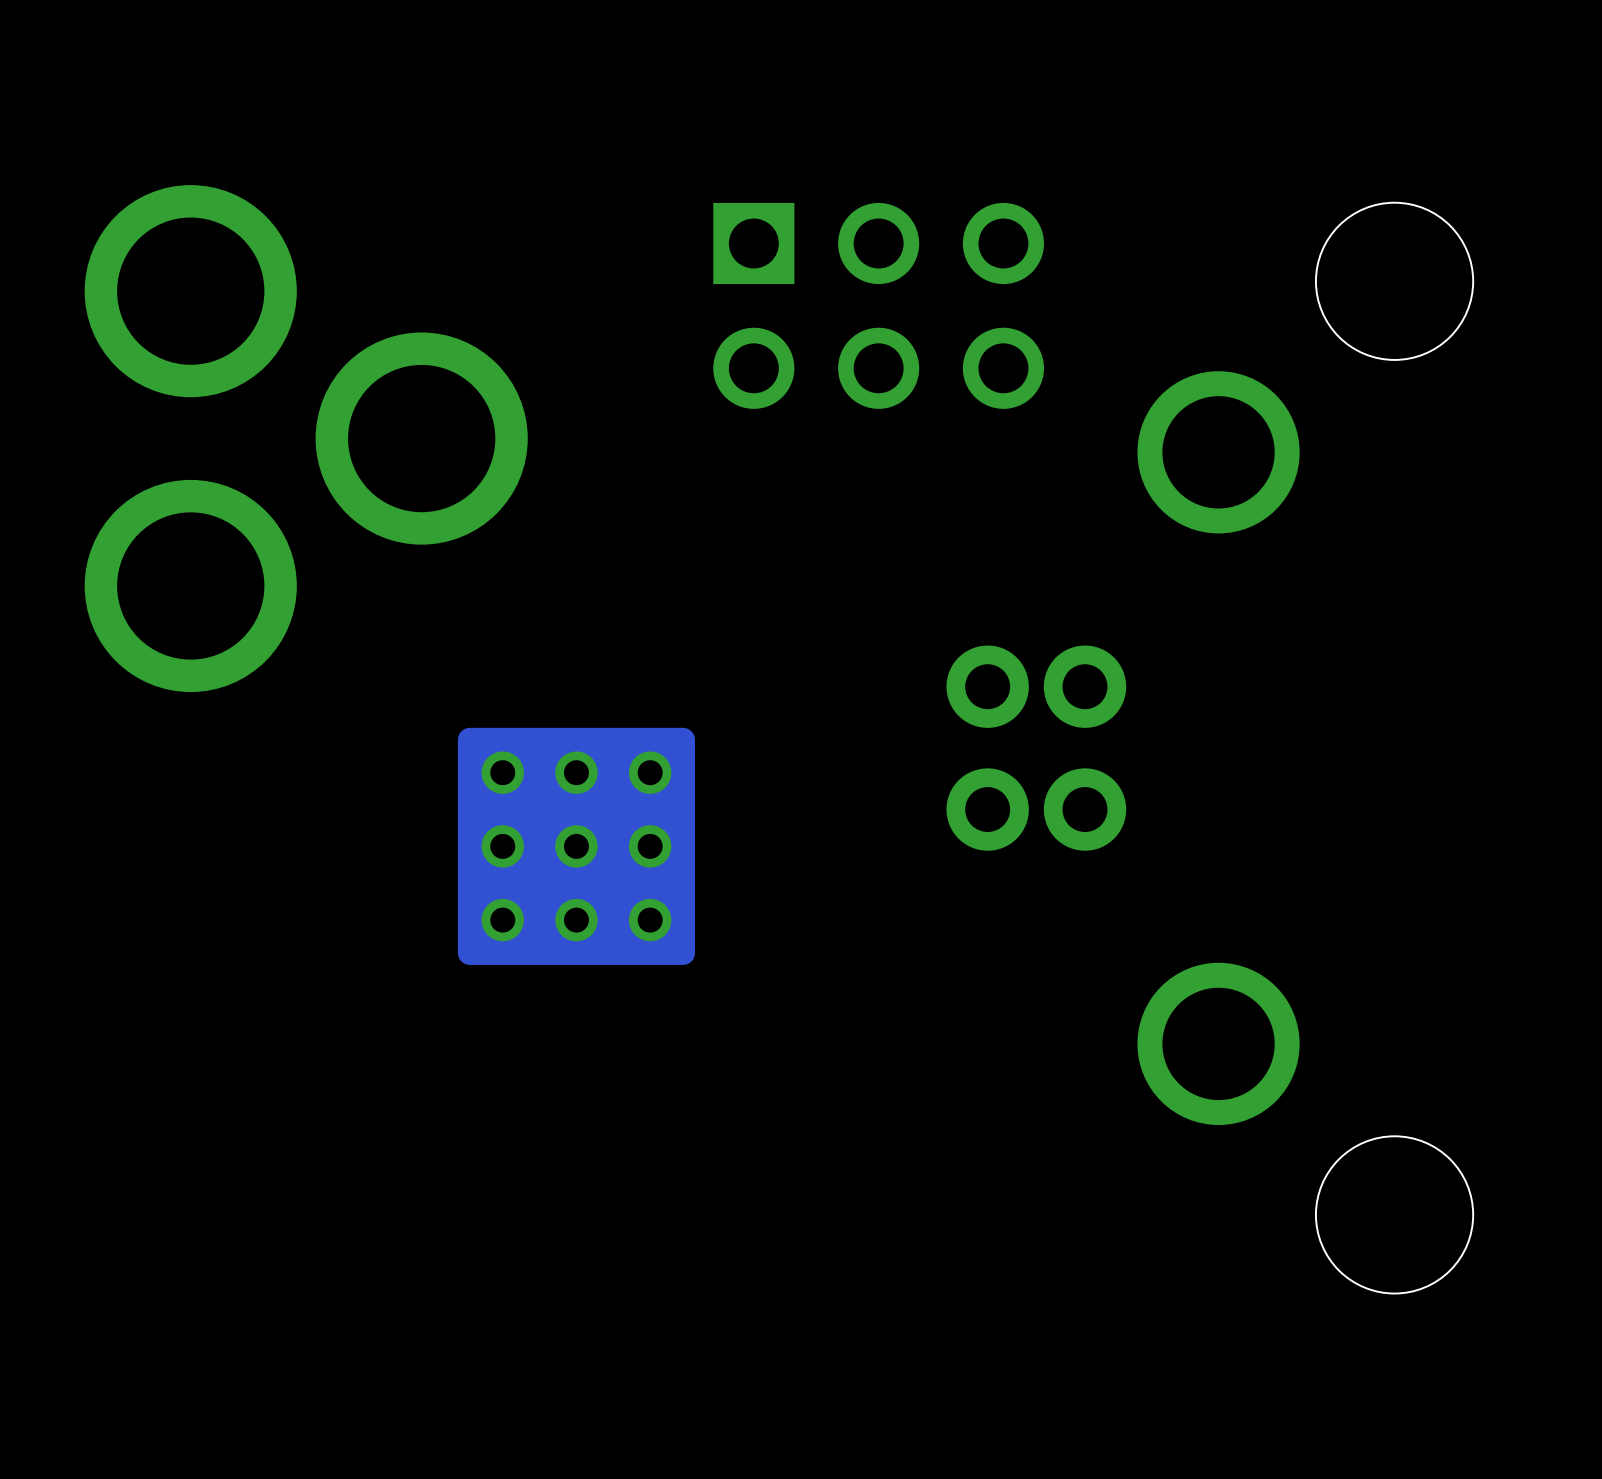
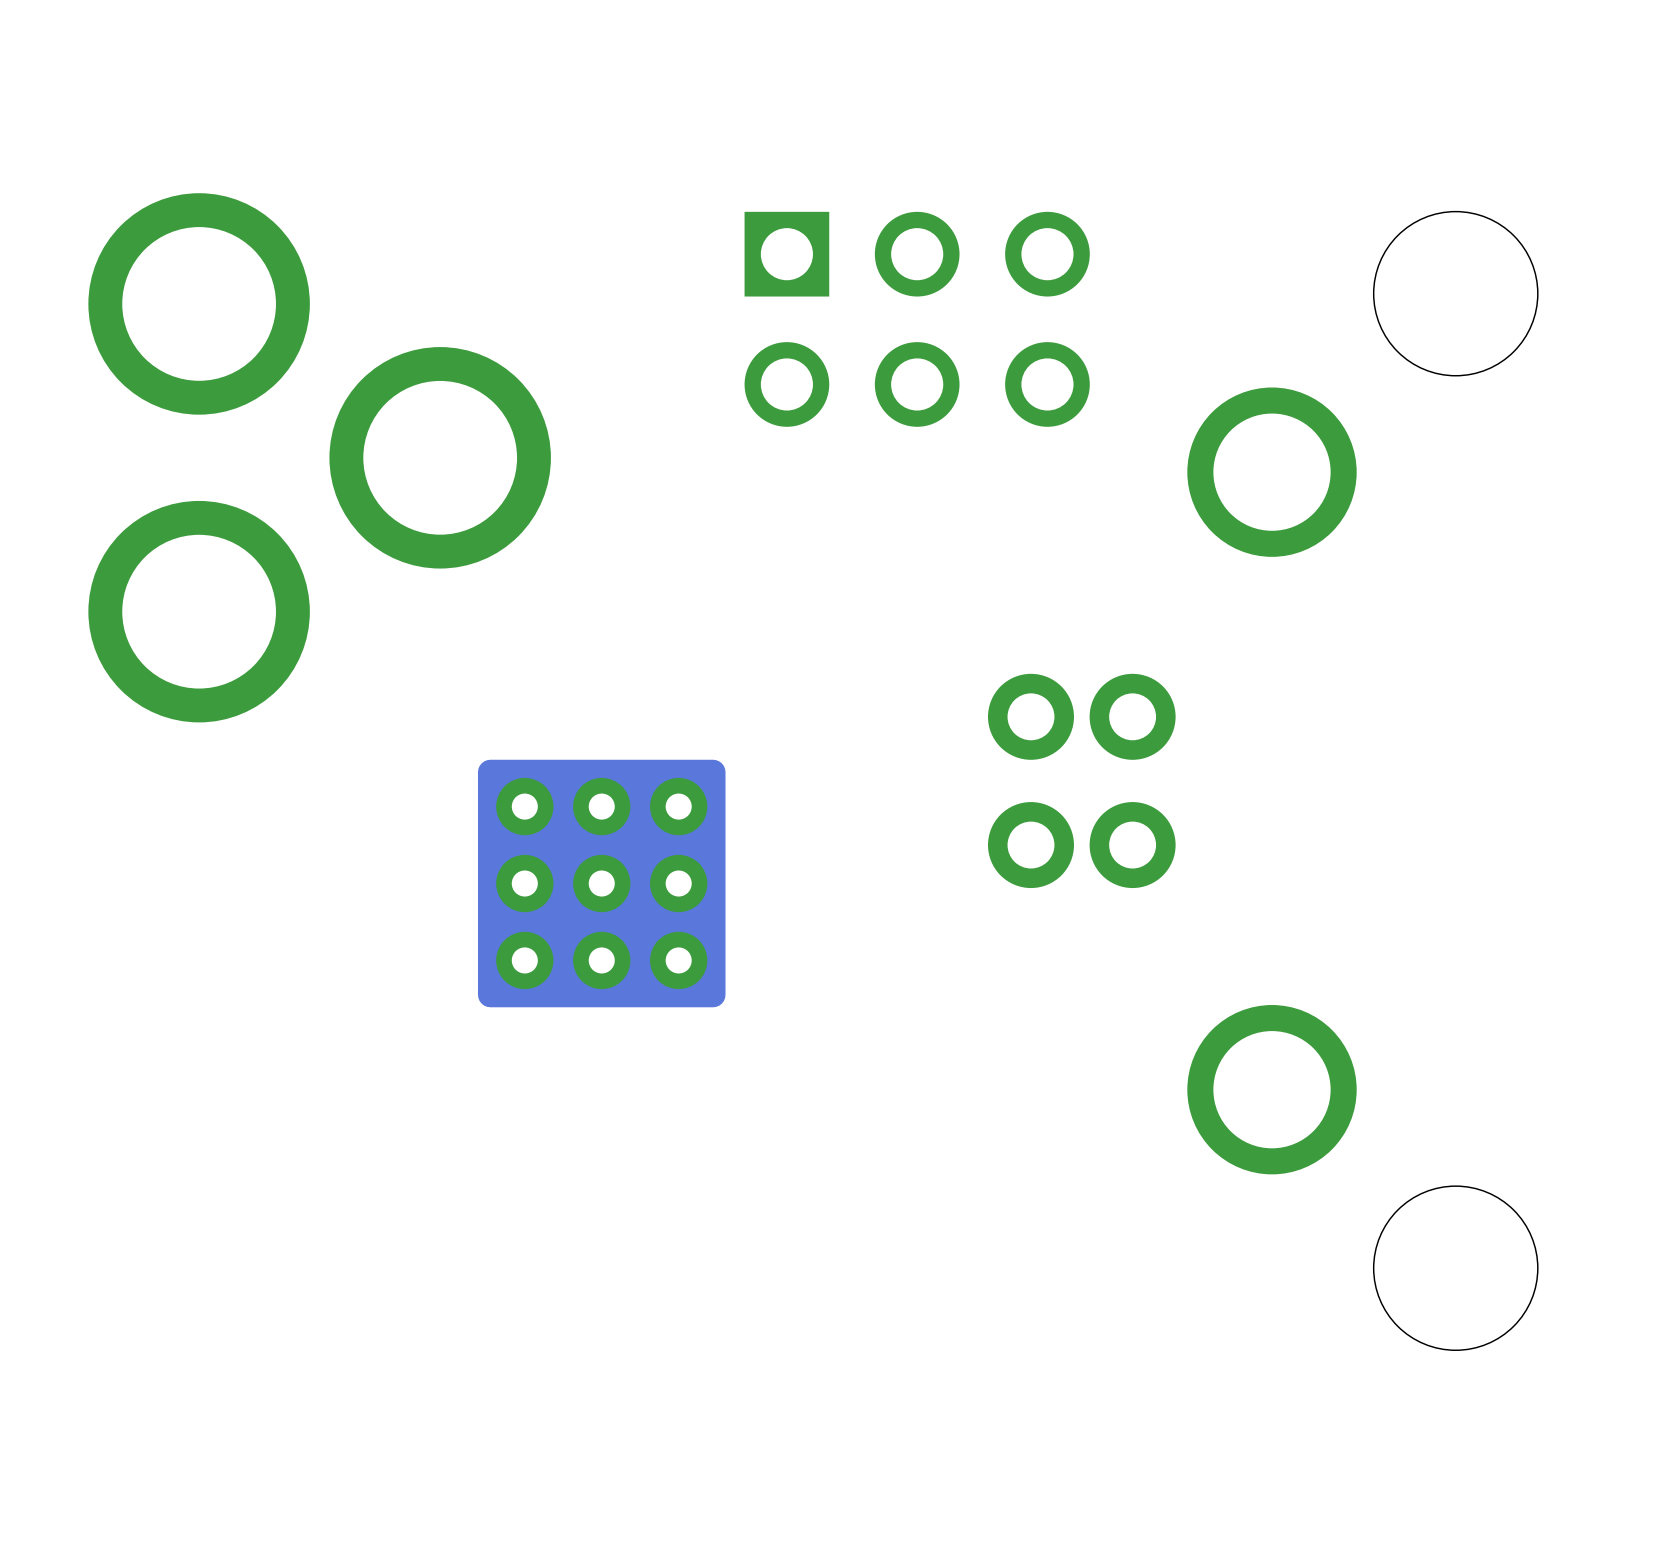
part footprint: [457, 727, 696, 965] -> [477, 759, 726, 1008]

